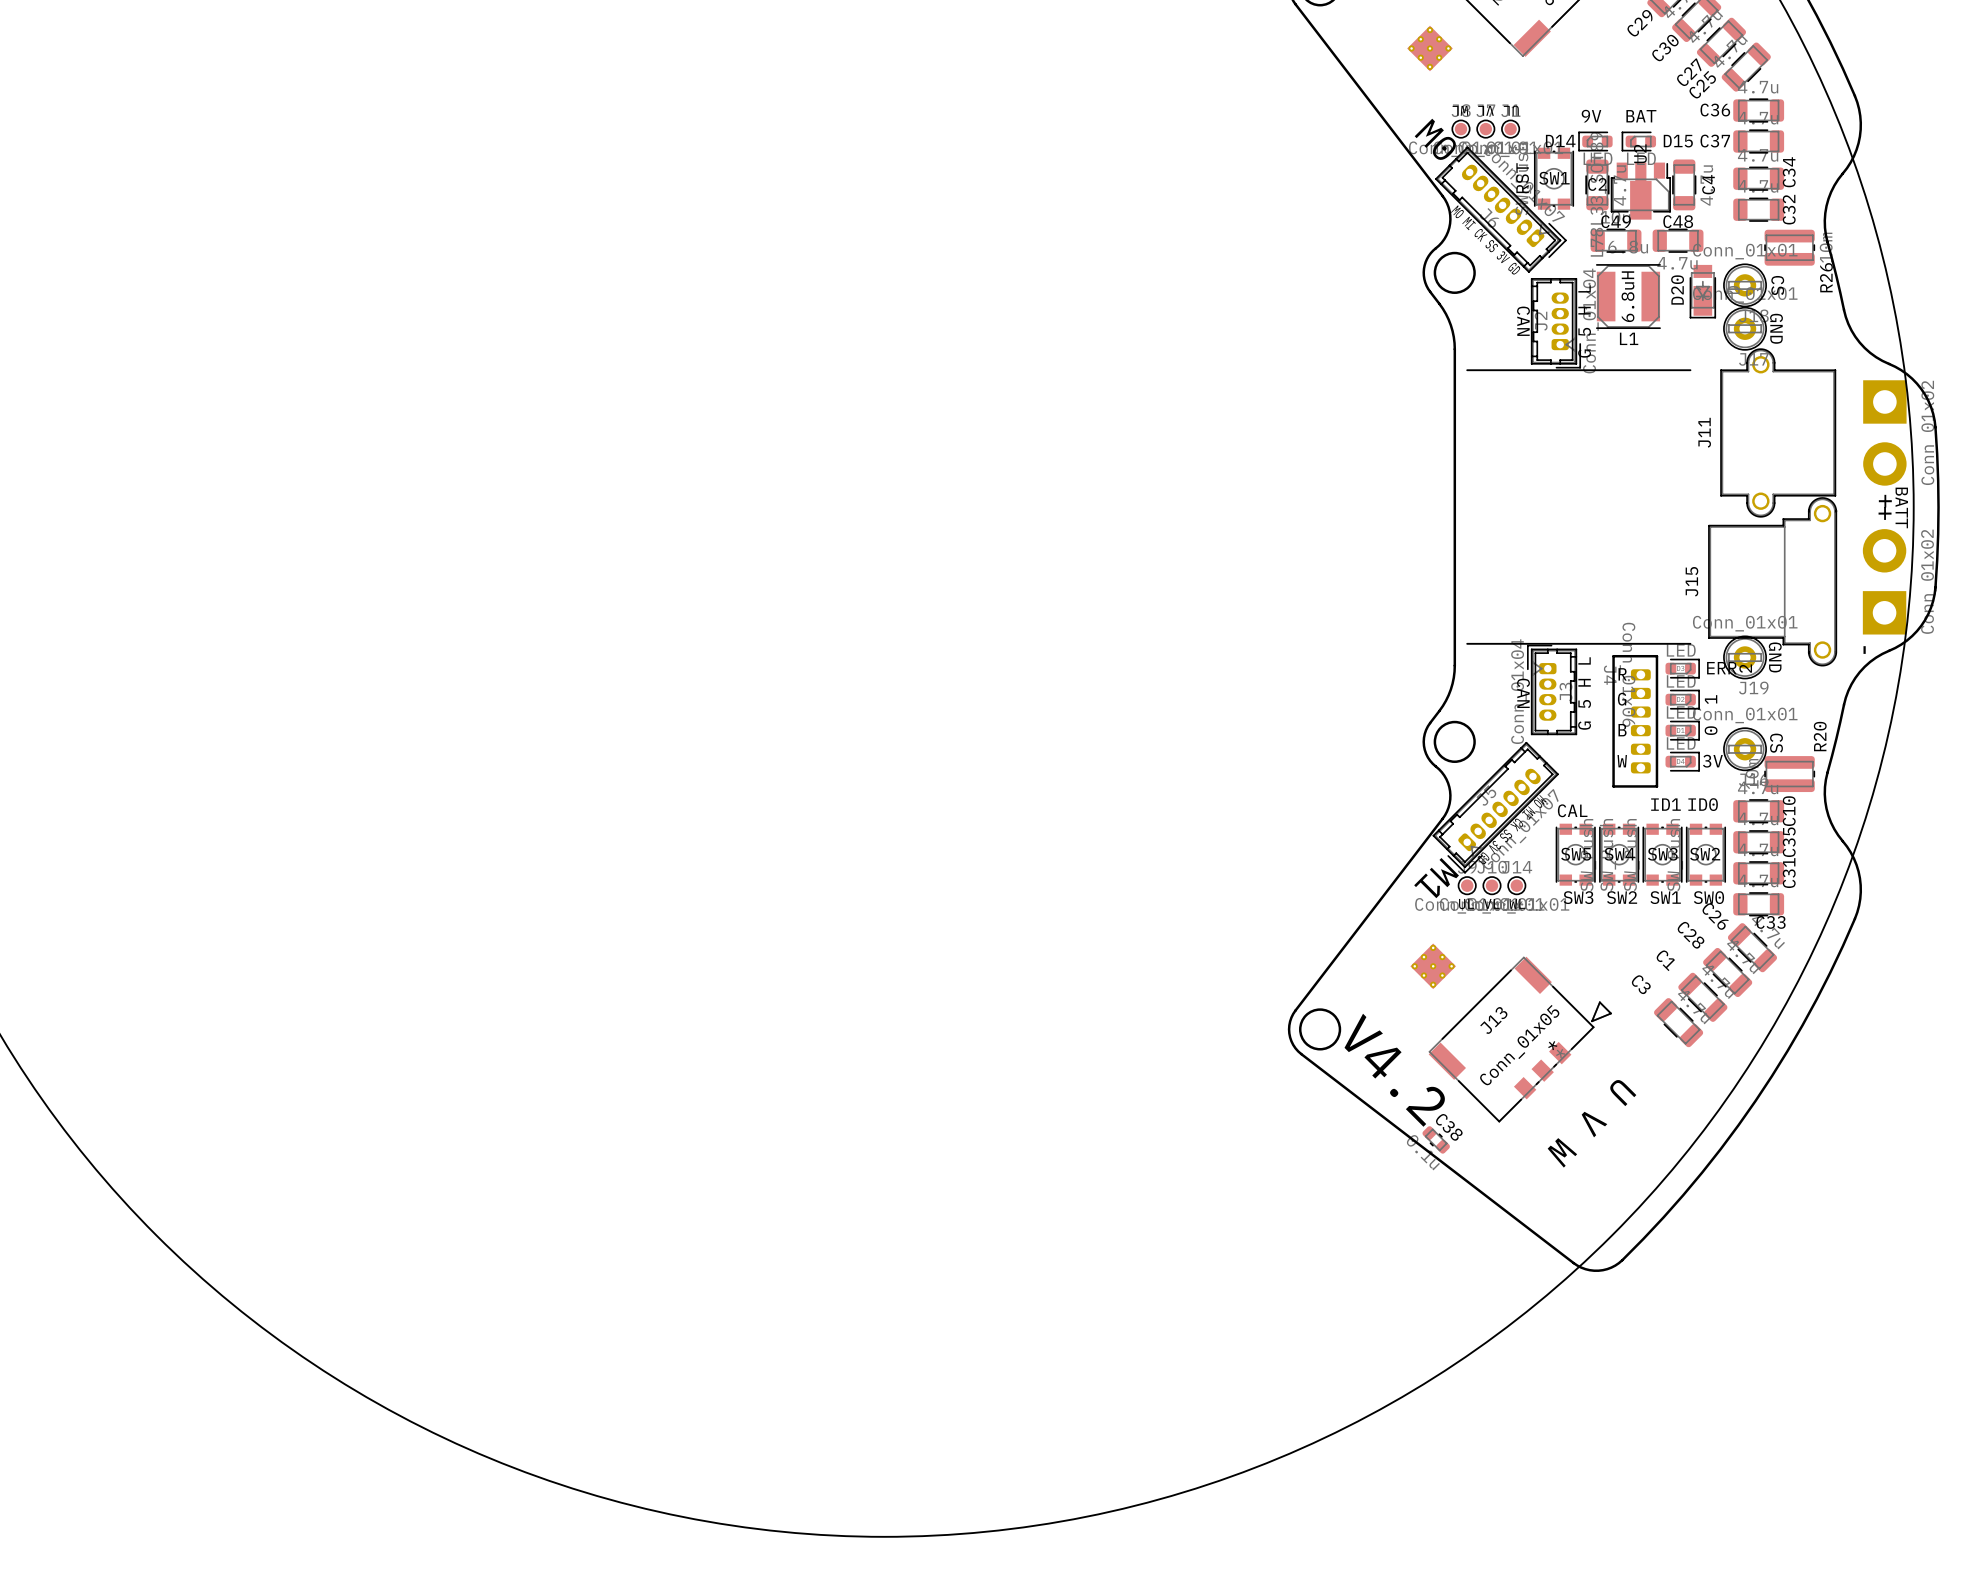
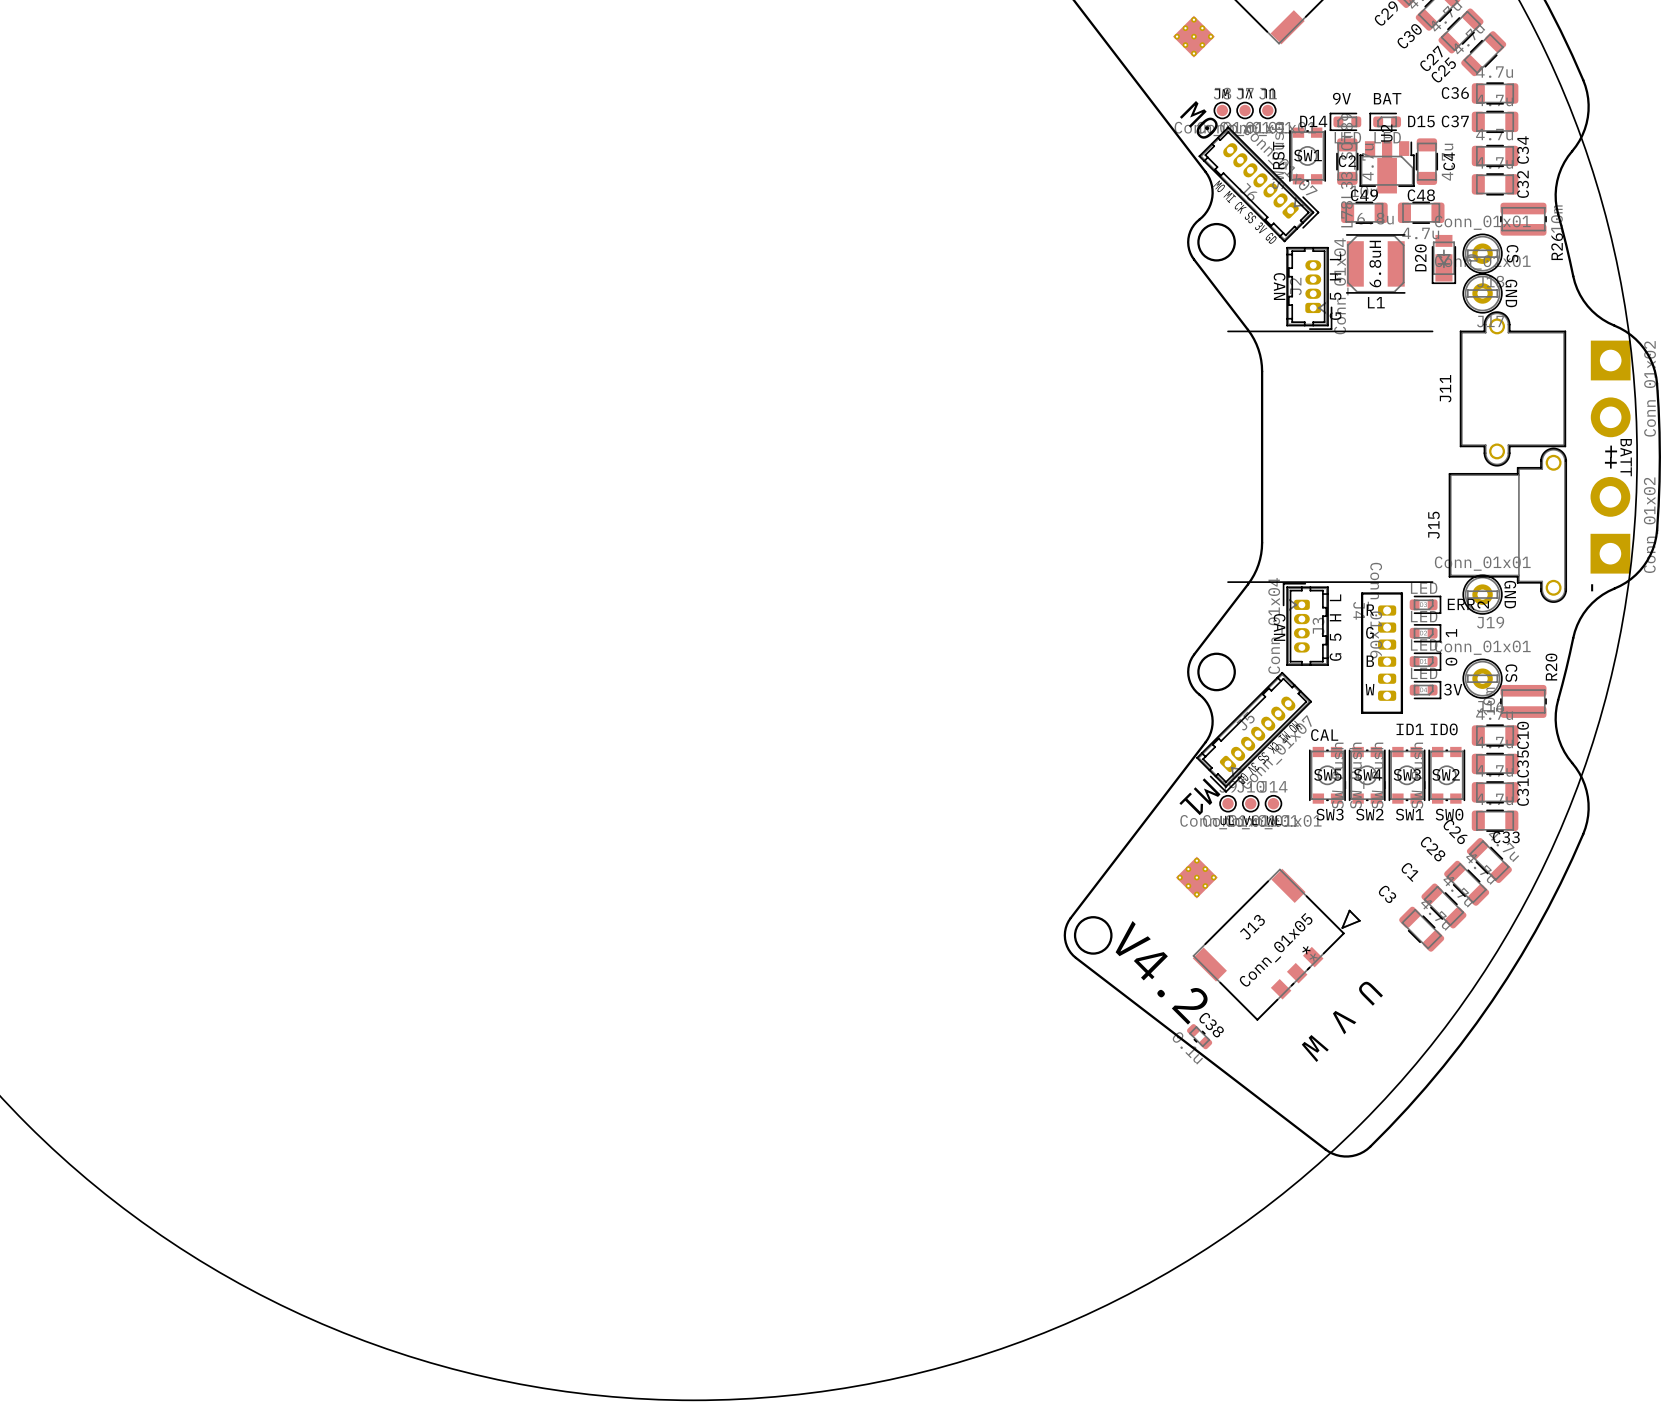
board edge: (1435, 248) (1425, 262) (1424, 279) (1428, 288) (1448, 319) (1454, 349) (1454, 671) (1450, 689) (1439, 710) -> (1199, 219) (1189, 234) (1190, 253) (1251, 334) (1258, 349) (1262, 371) (1262, 542) (1260, 559) (1251, 579) (1202, 643)

